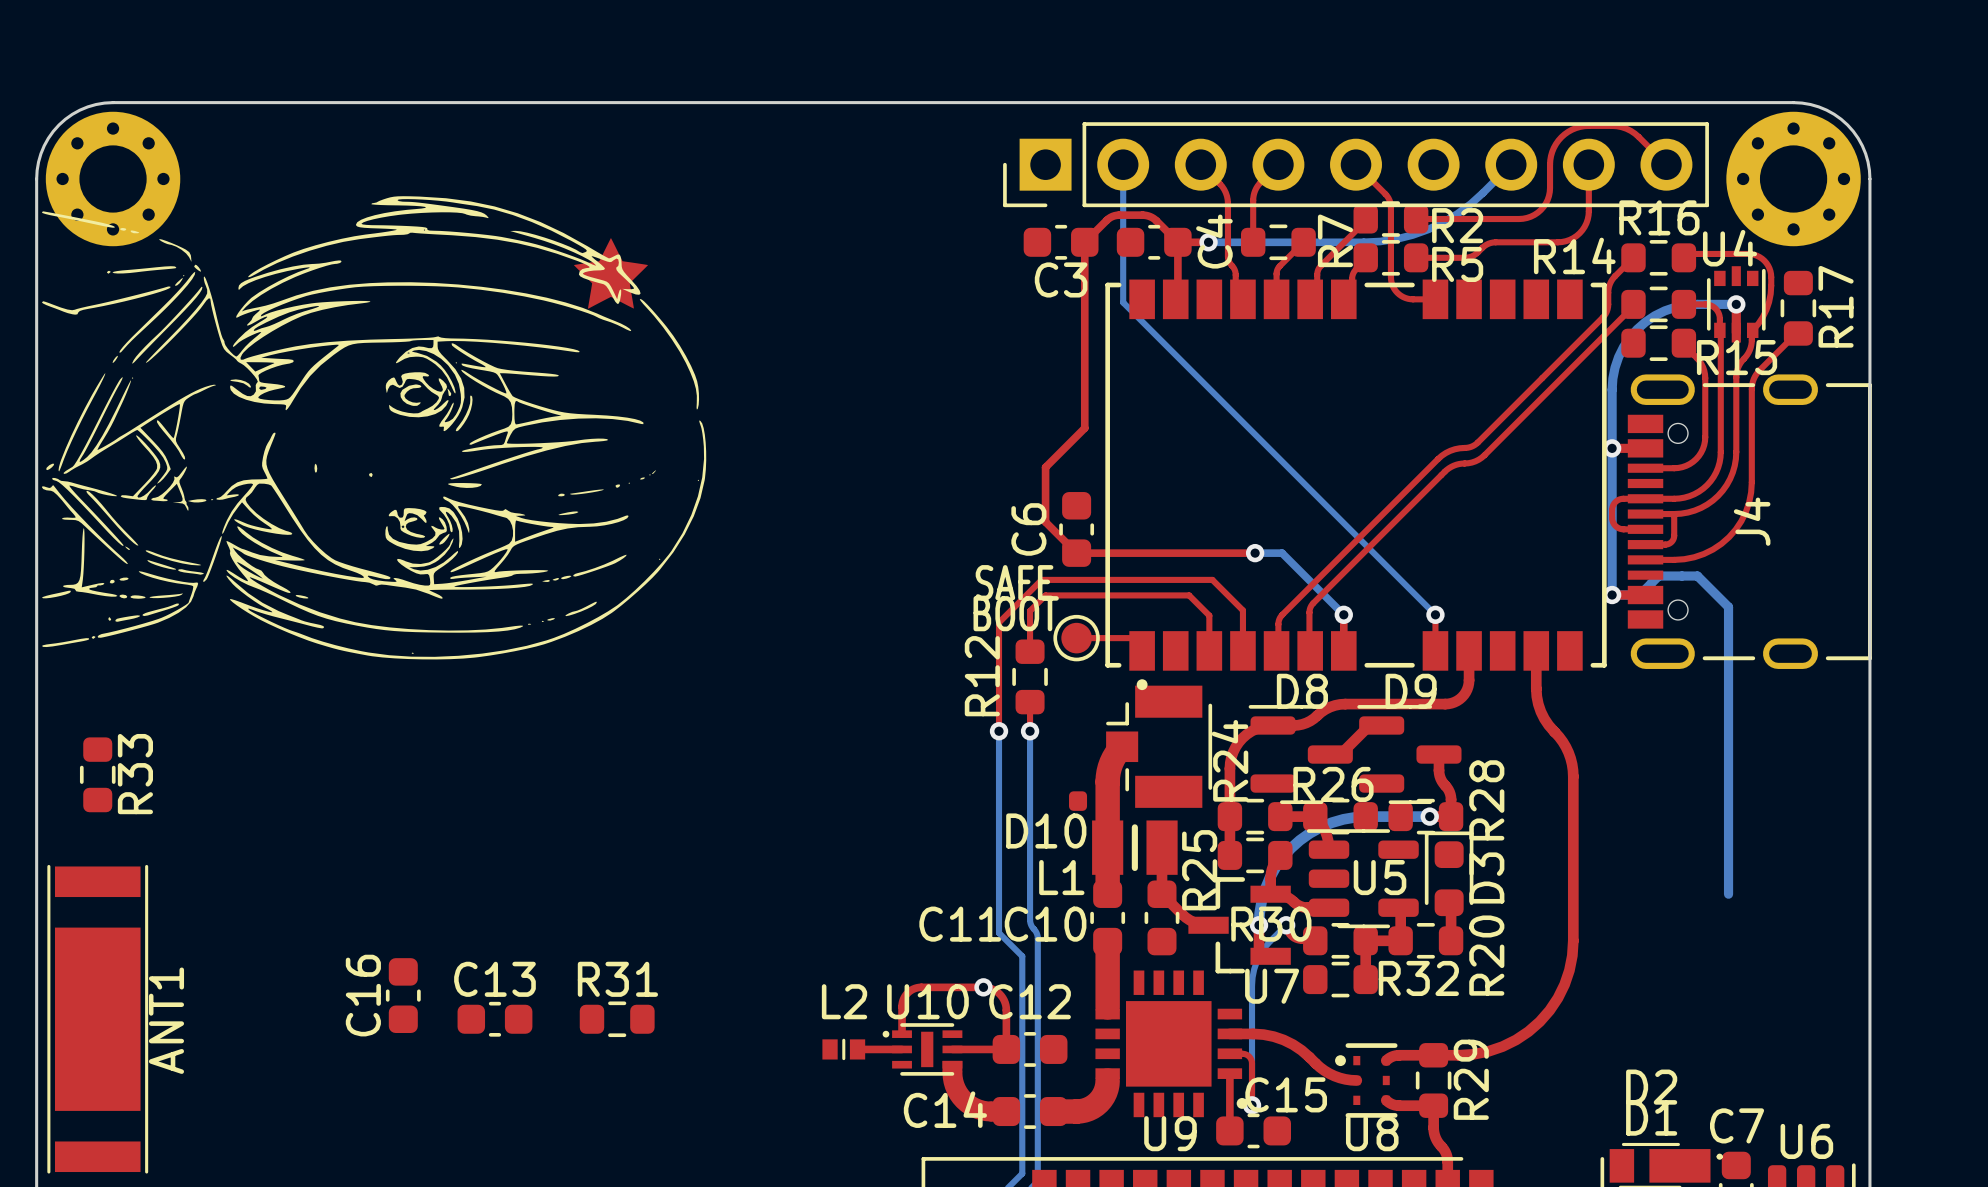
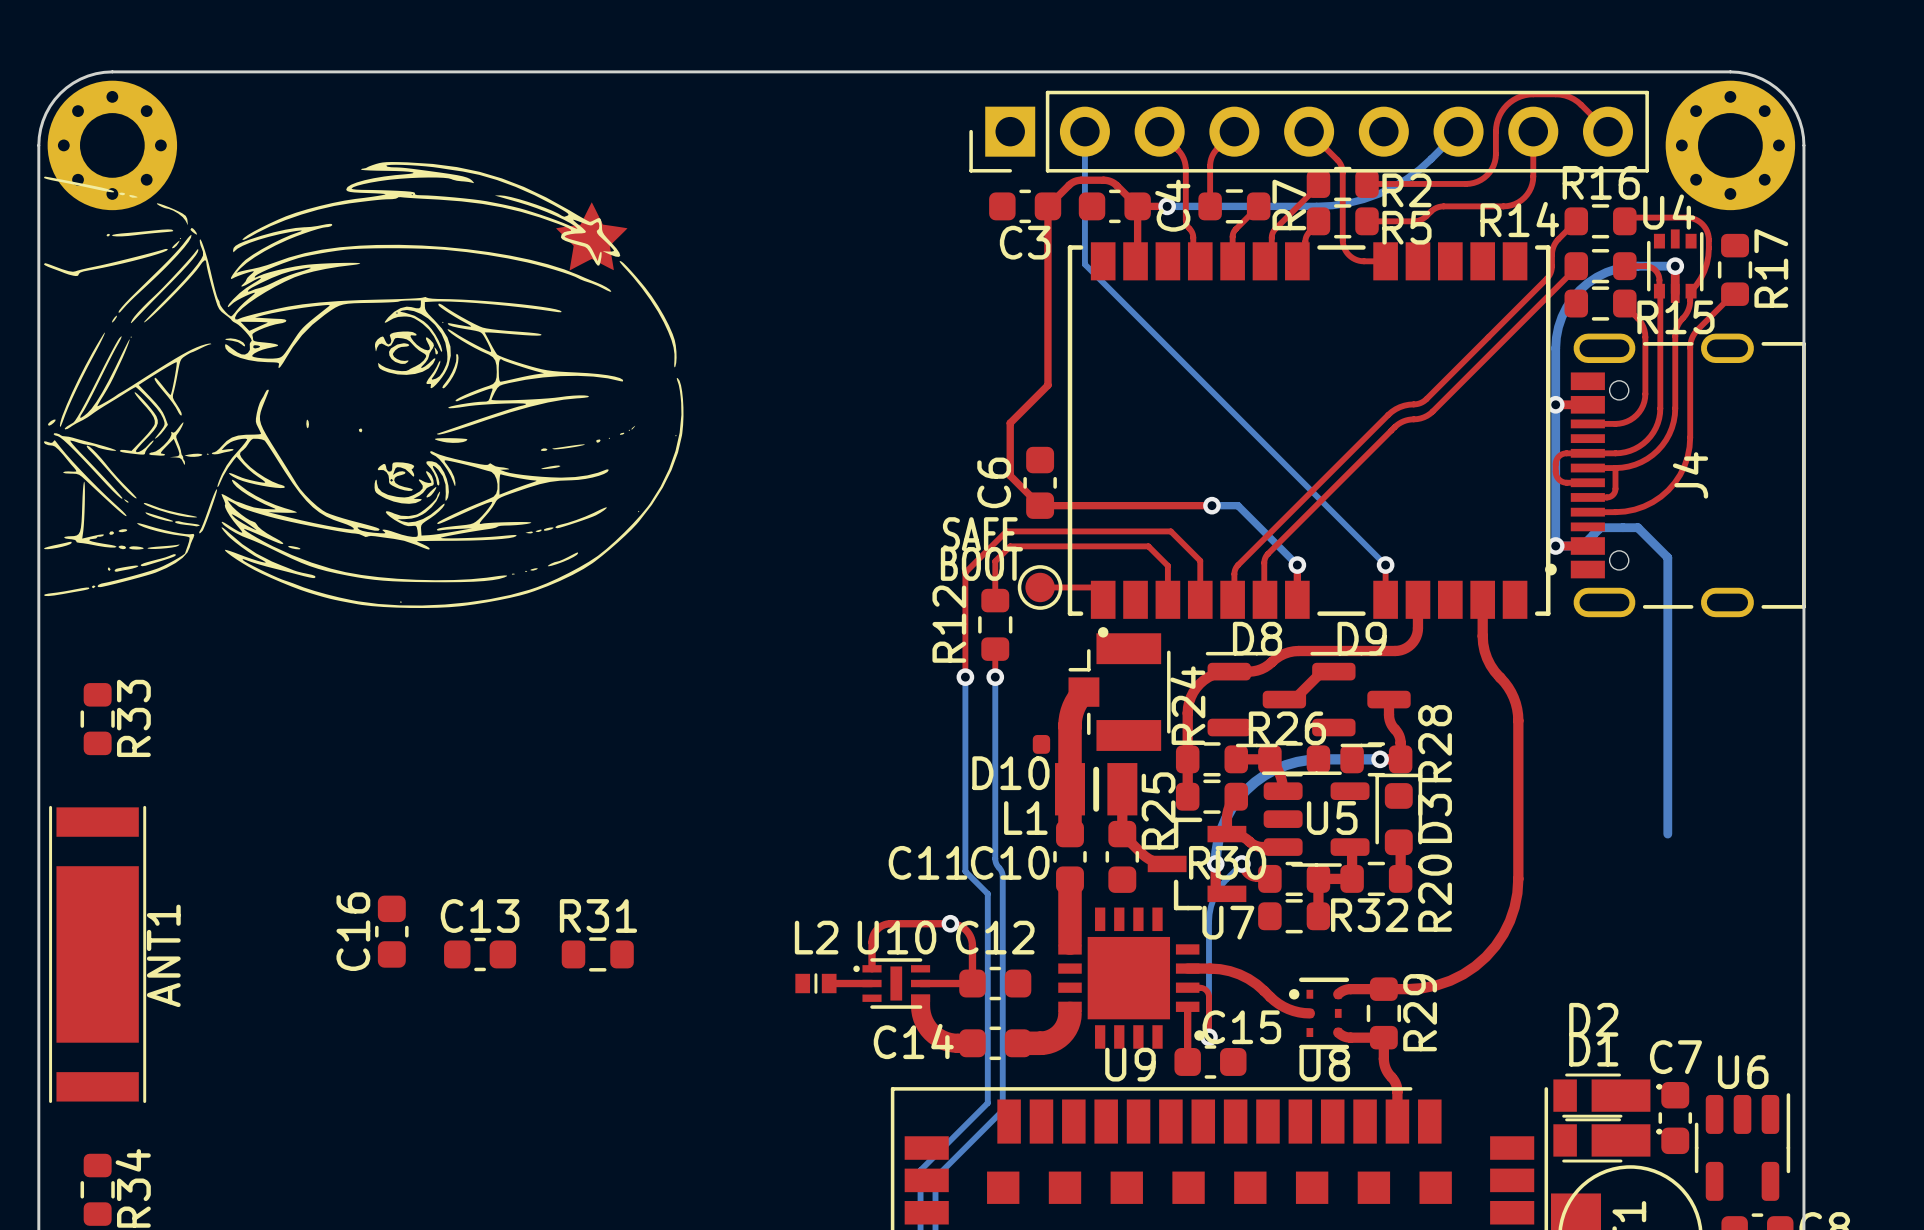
J4 footprint: [1627, 374, 1872, 669] -> [1545, 333, 1806, 618]

